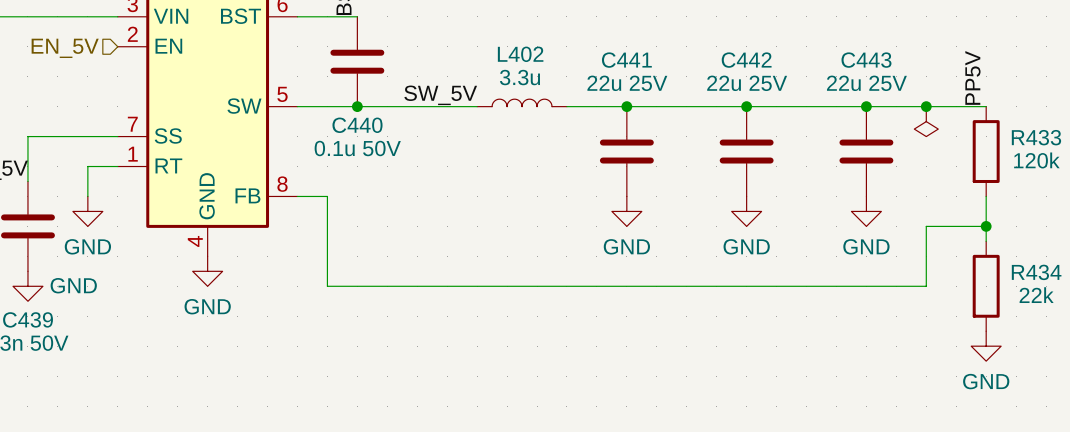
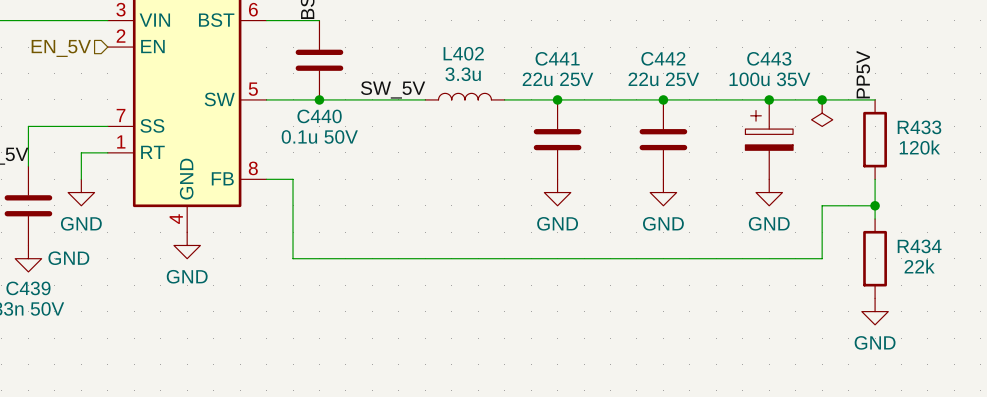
C443 value: 22u 25V (866, 83) -> 100u 35V (769, 79)
C443 symbol: [839, 106, 894, 197] -> [745, 99, 794, 180]

